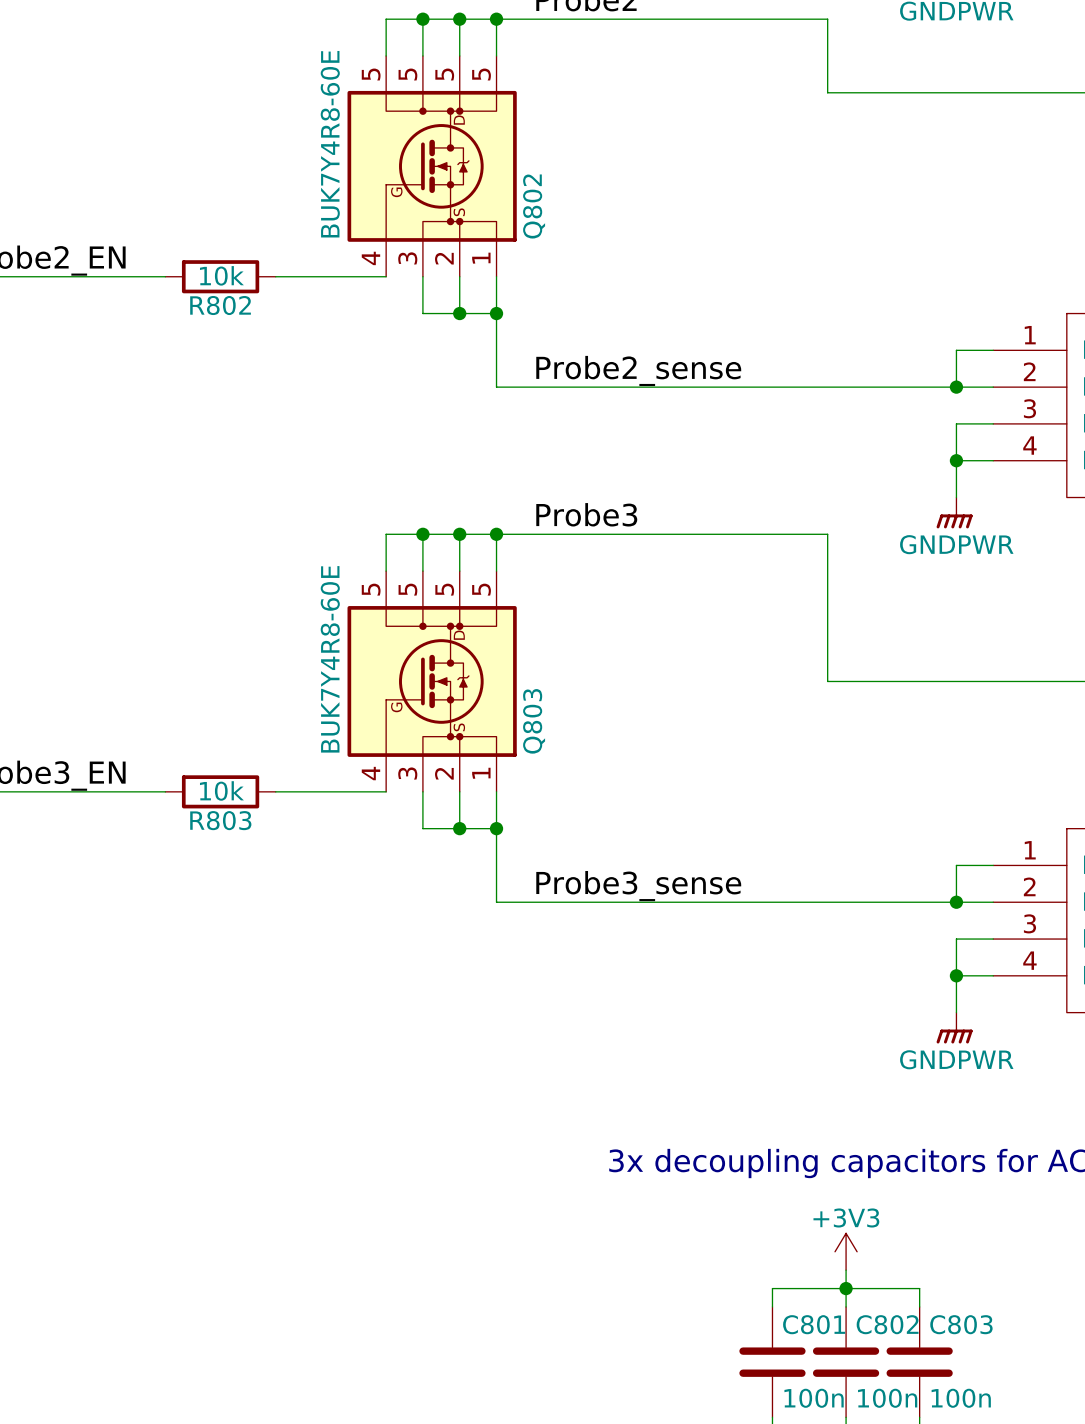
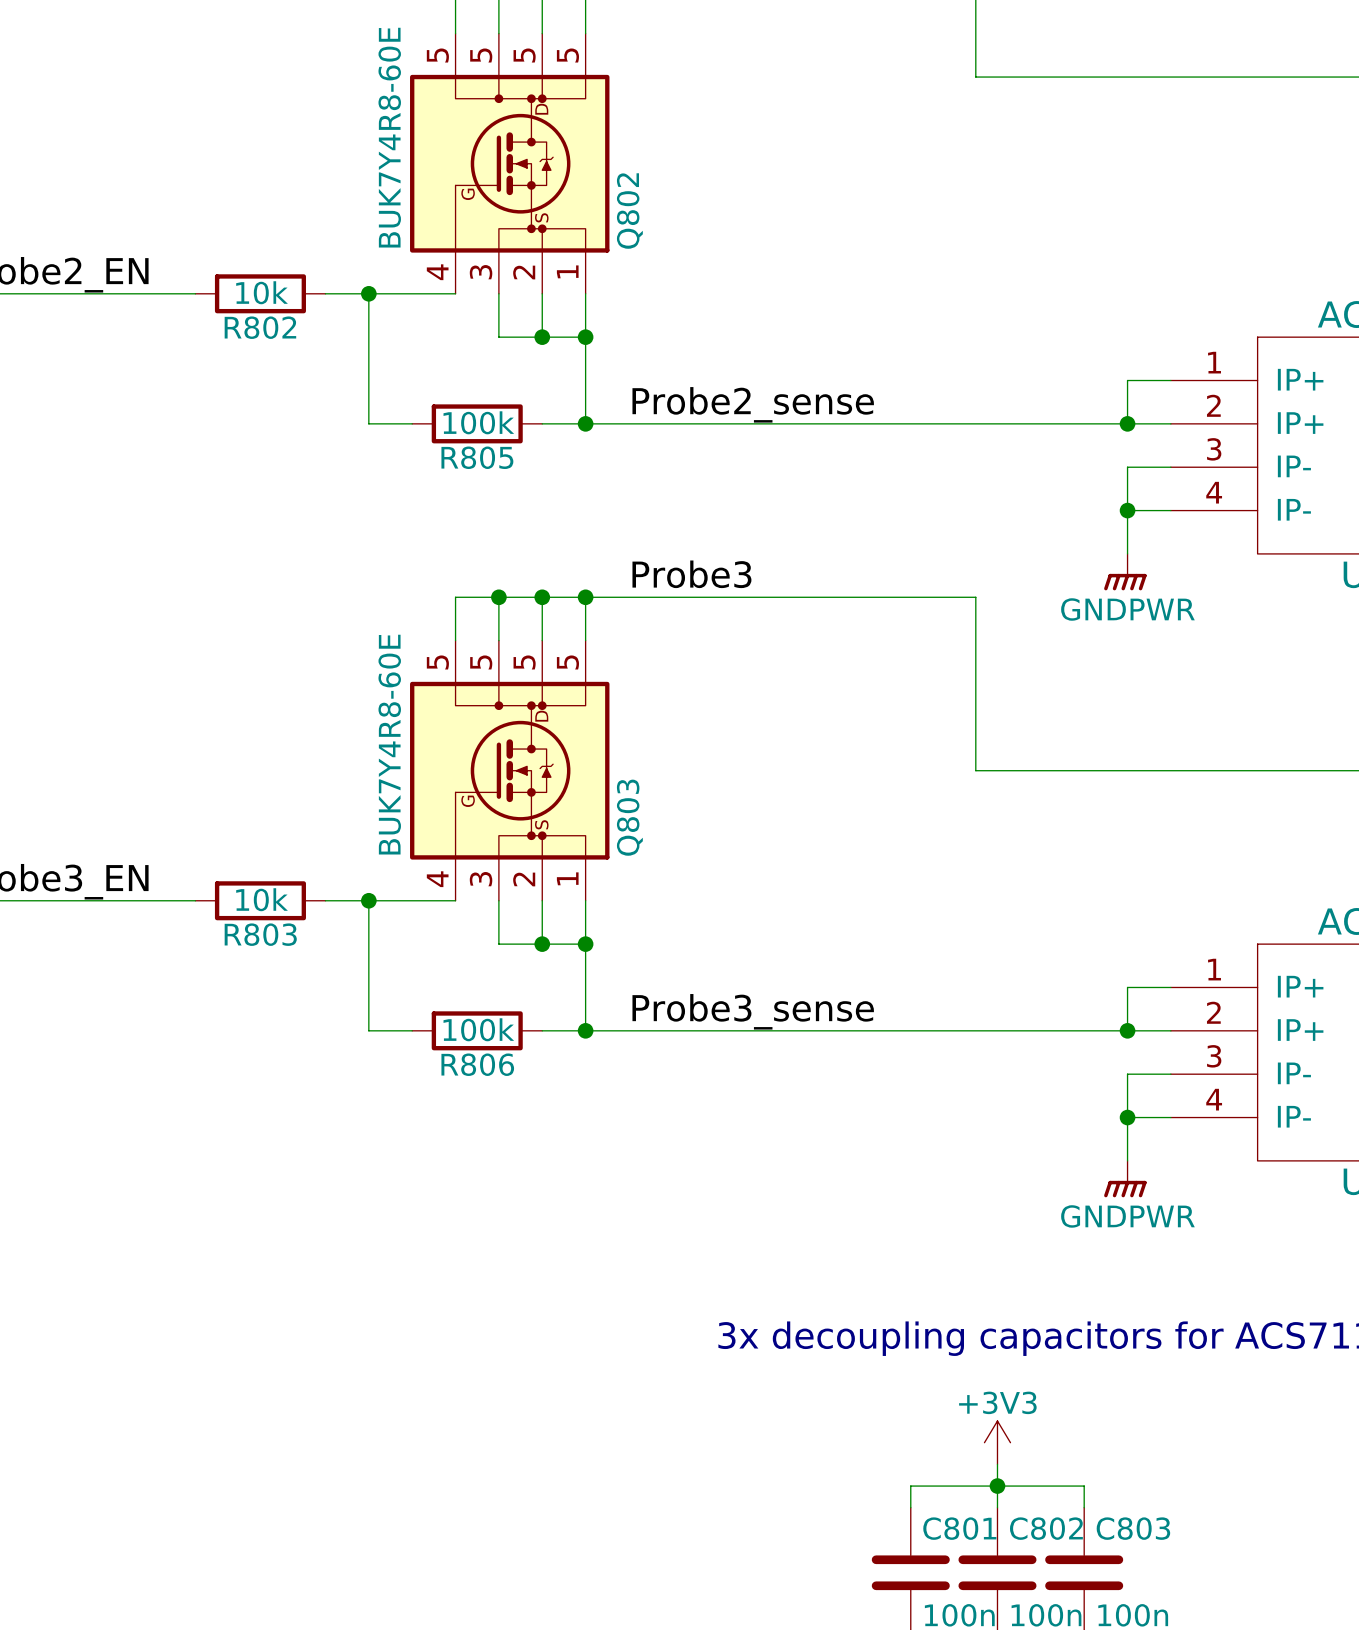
wire: none -> (368, 293) (368, 423) (412, 423)
junction: none -> (368, 293)
R805: none -> 100k (477, 423)
wire: none -> (542, 423) (585, 423)
junction: none -> (585, 423)
wire: none -> (368, 900) (368, 1030) (412, 1030)
junction: none -> (368, 900)
R806: none -> 100k (477, 1030)
wire: none -> (542, 1030) (585, 1030)
junction: none -> (585, 1030)

